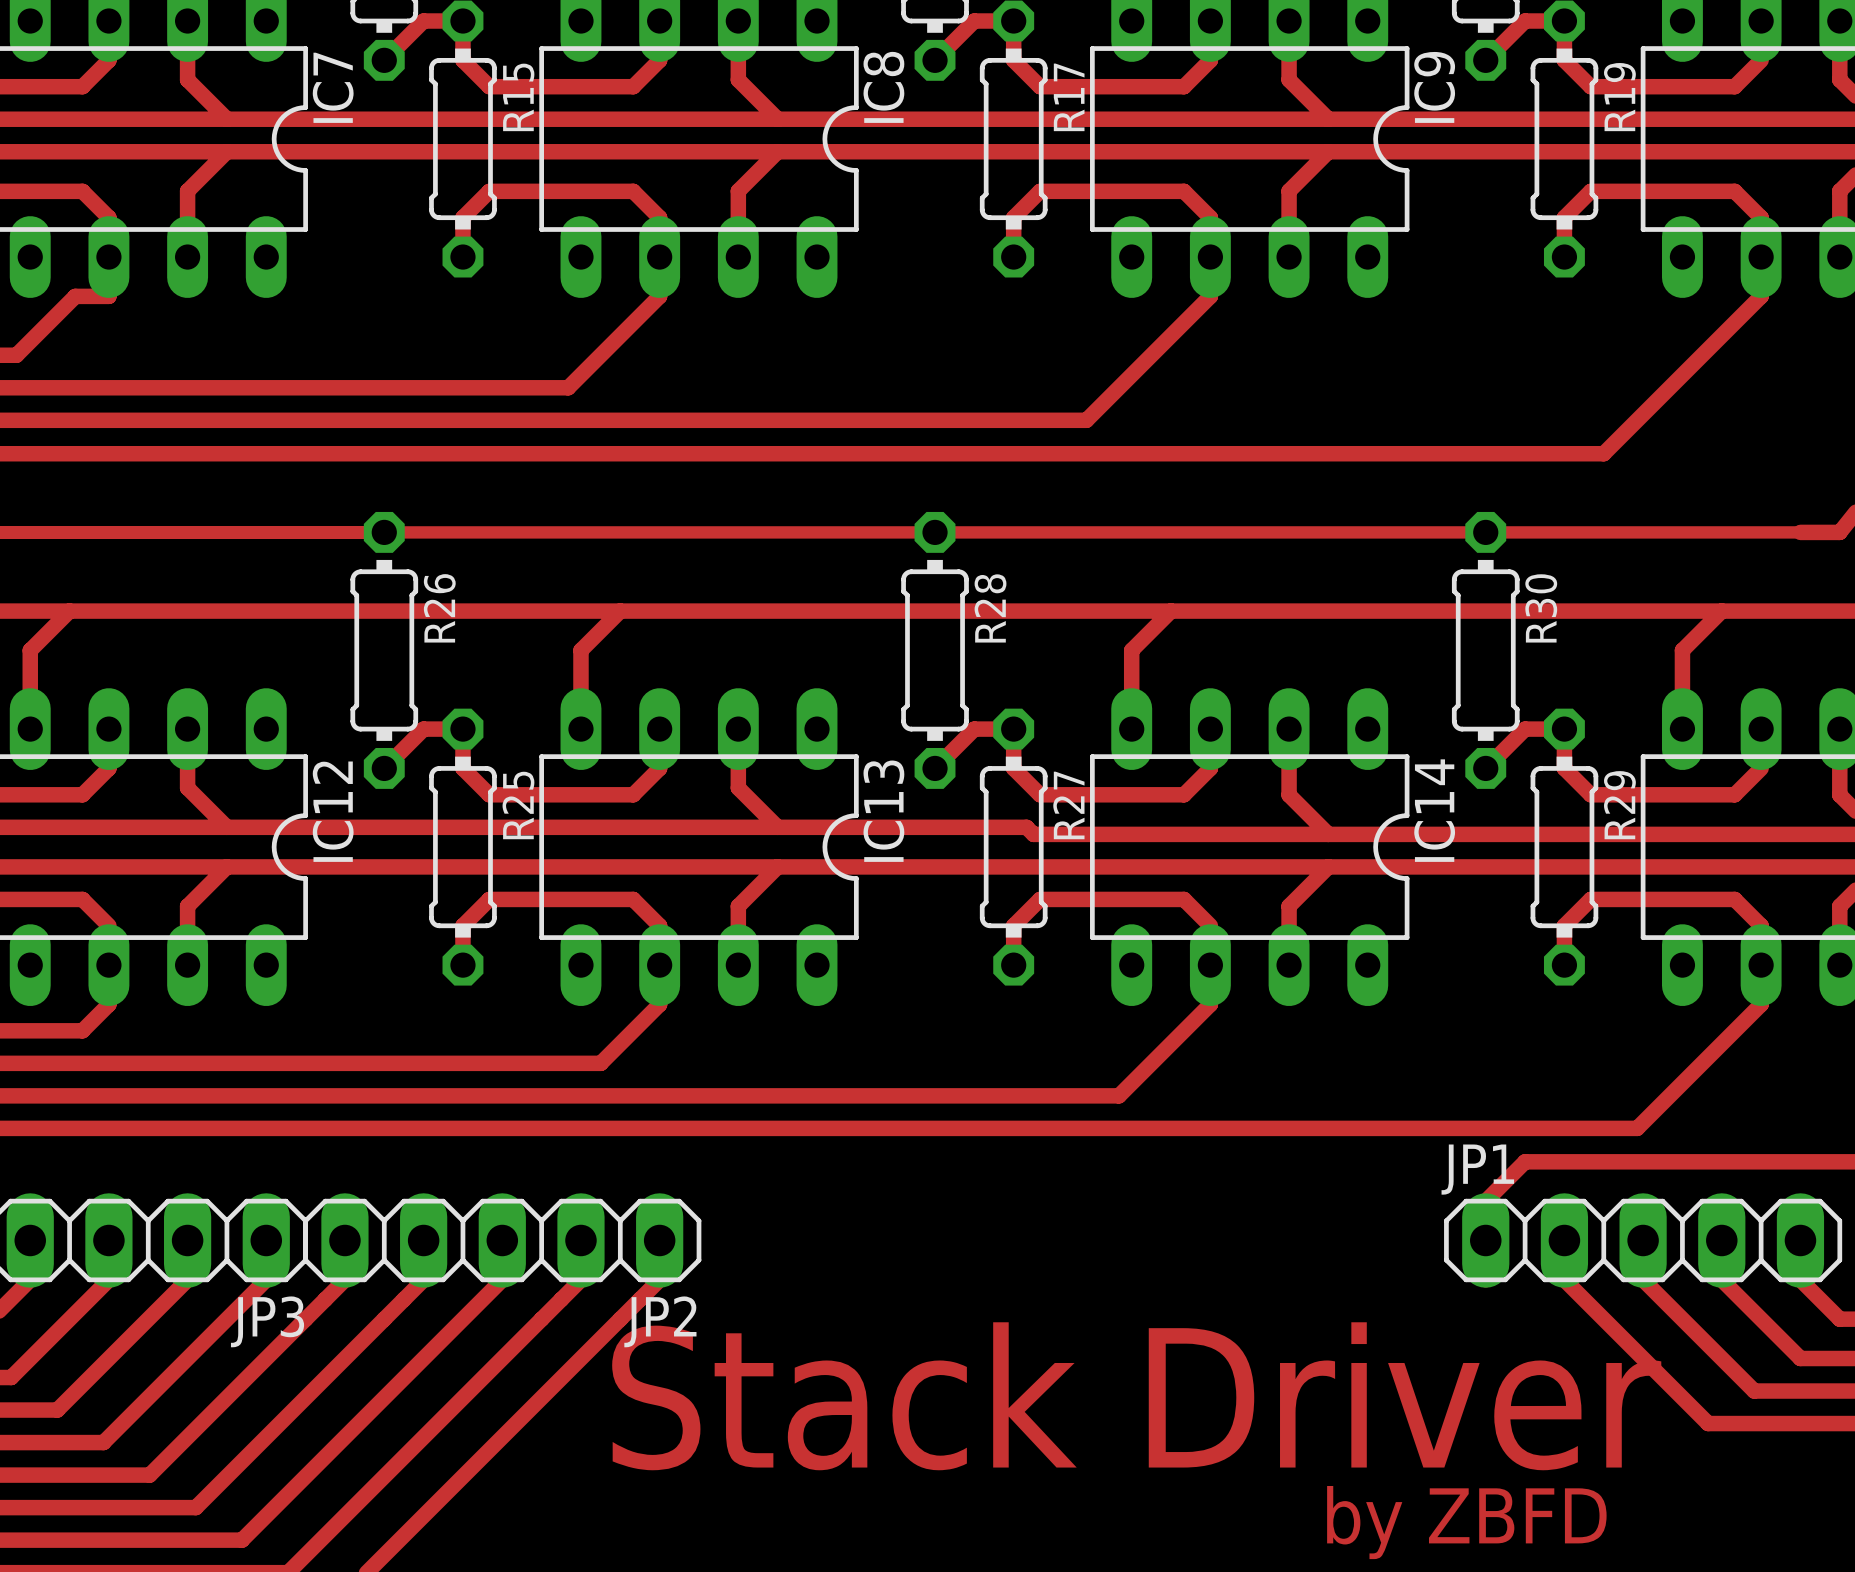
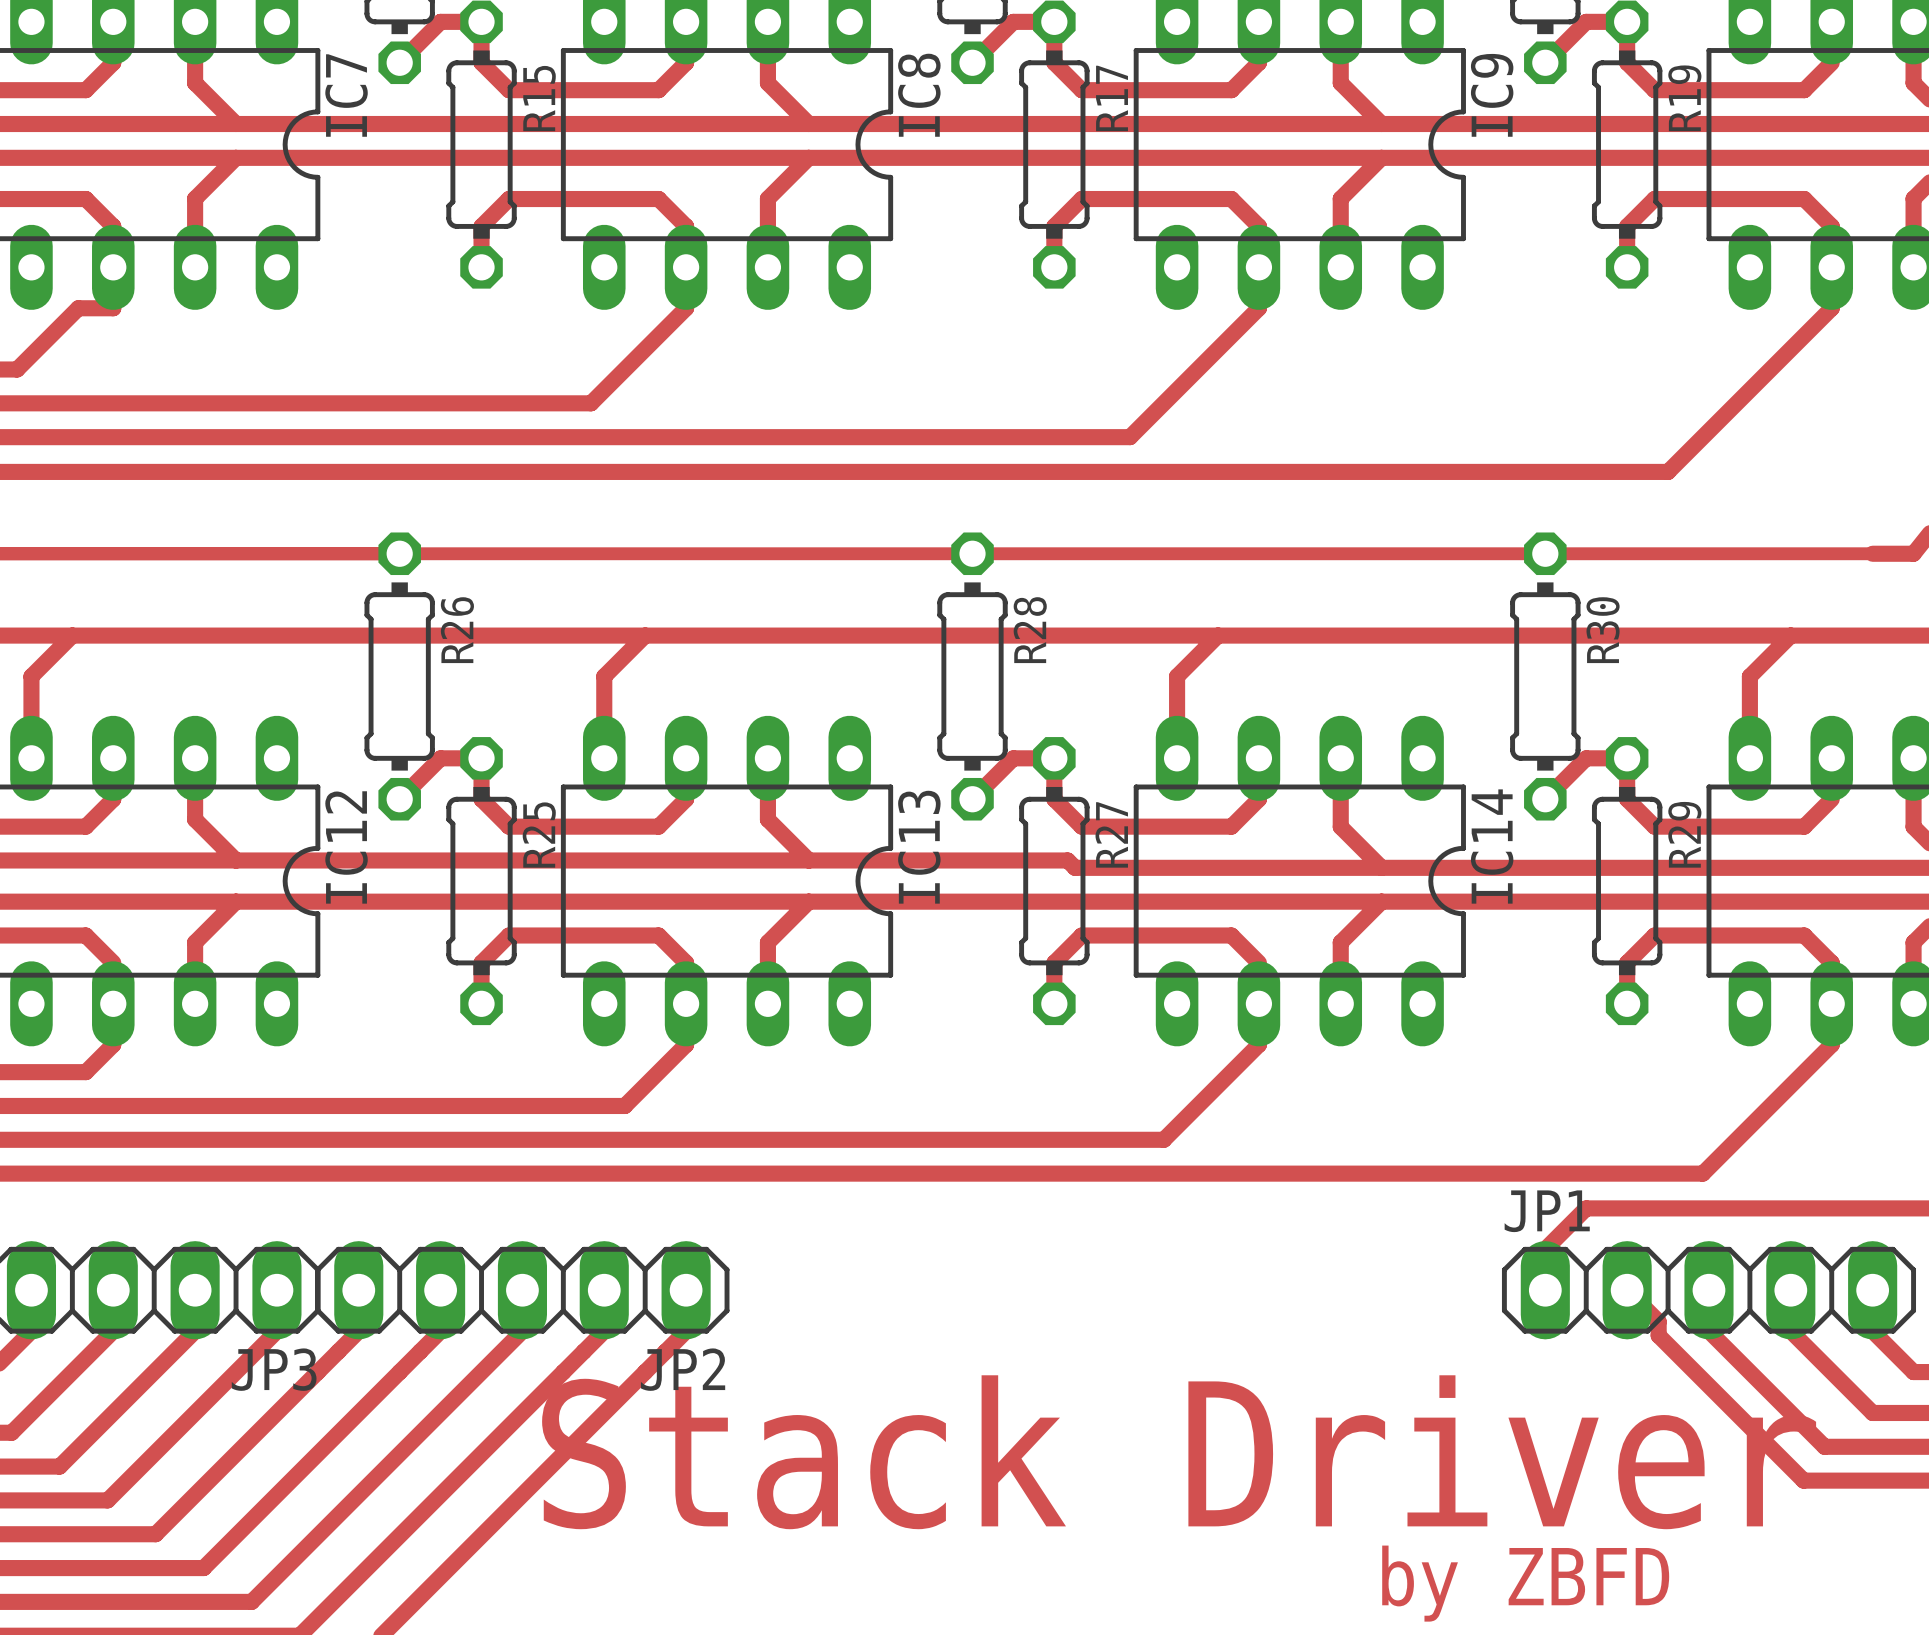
track: (1564, 1279) (1708, 1423) (1734, 1423) -> (1627, 1290) (1658, 1321) (1658, 1335) (1803, 1480)

